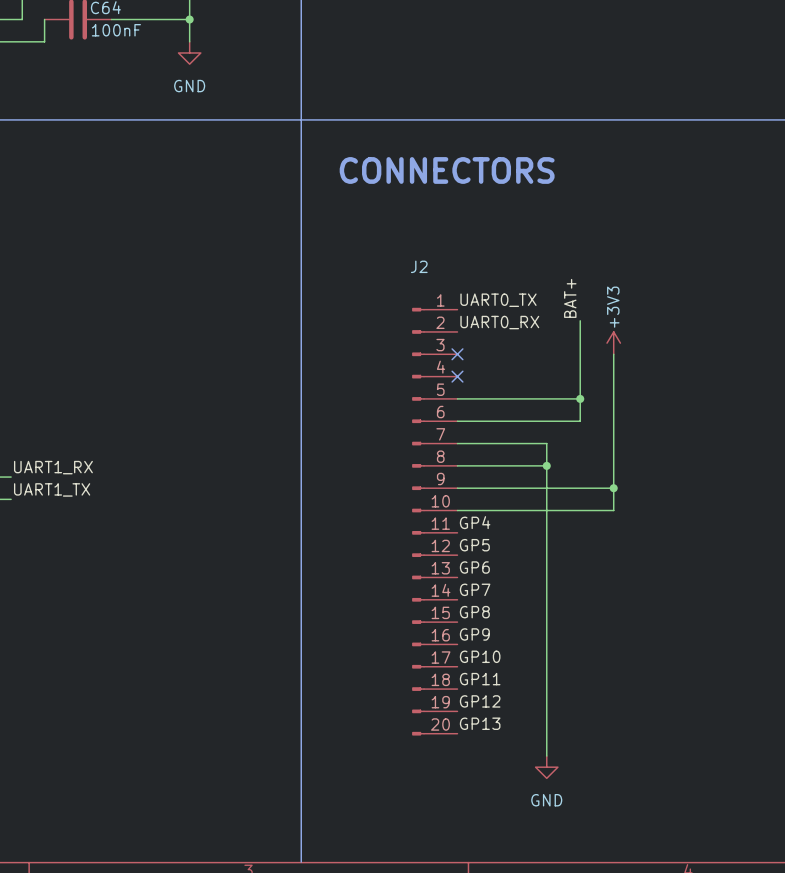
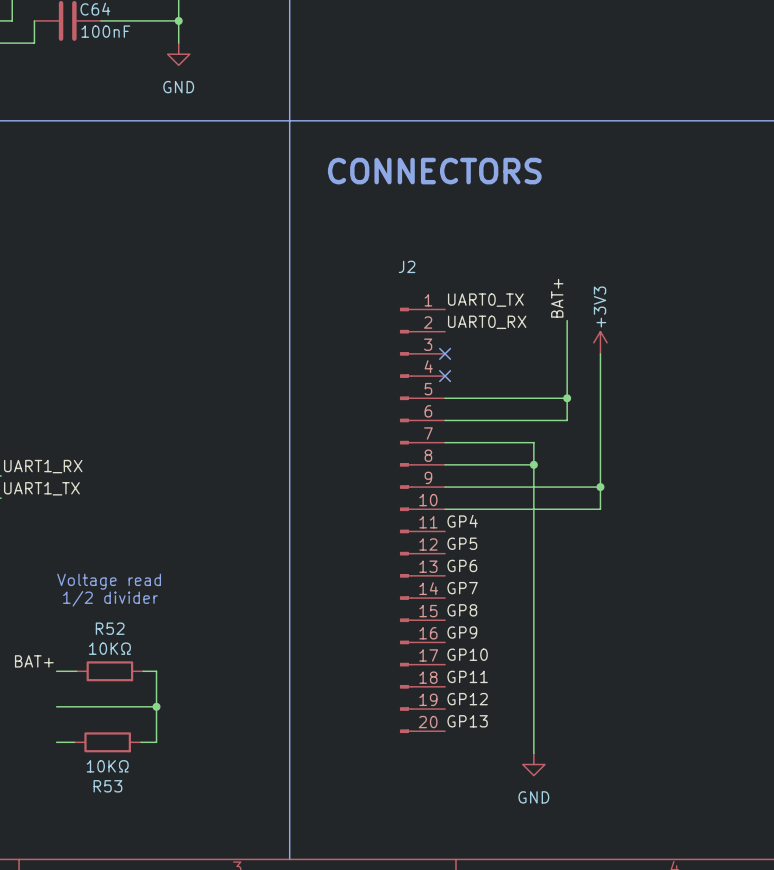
text: none -> Voltage read (109, 581)
text: none -> 1/2 divider (110, 598)
label: none -> BAT+ (34, 661)
wire: none -> (56, 671) (76, 671)
R52: none -> 10KΩ (109, 671)
wire: none -> (143, 671) (156, 671) (156, 742) (140, 742)
wire: none -> (56, 706) (156, 706)
junction: none -> (156, 706)
wire: none -> (56, 742) (74, 742)
R53: none -> 10KΩ (107, 742)

